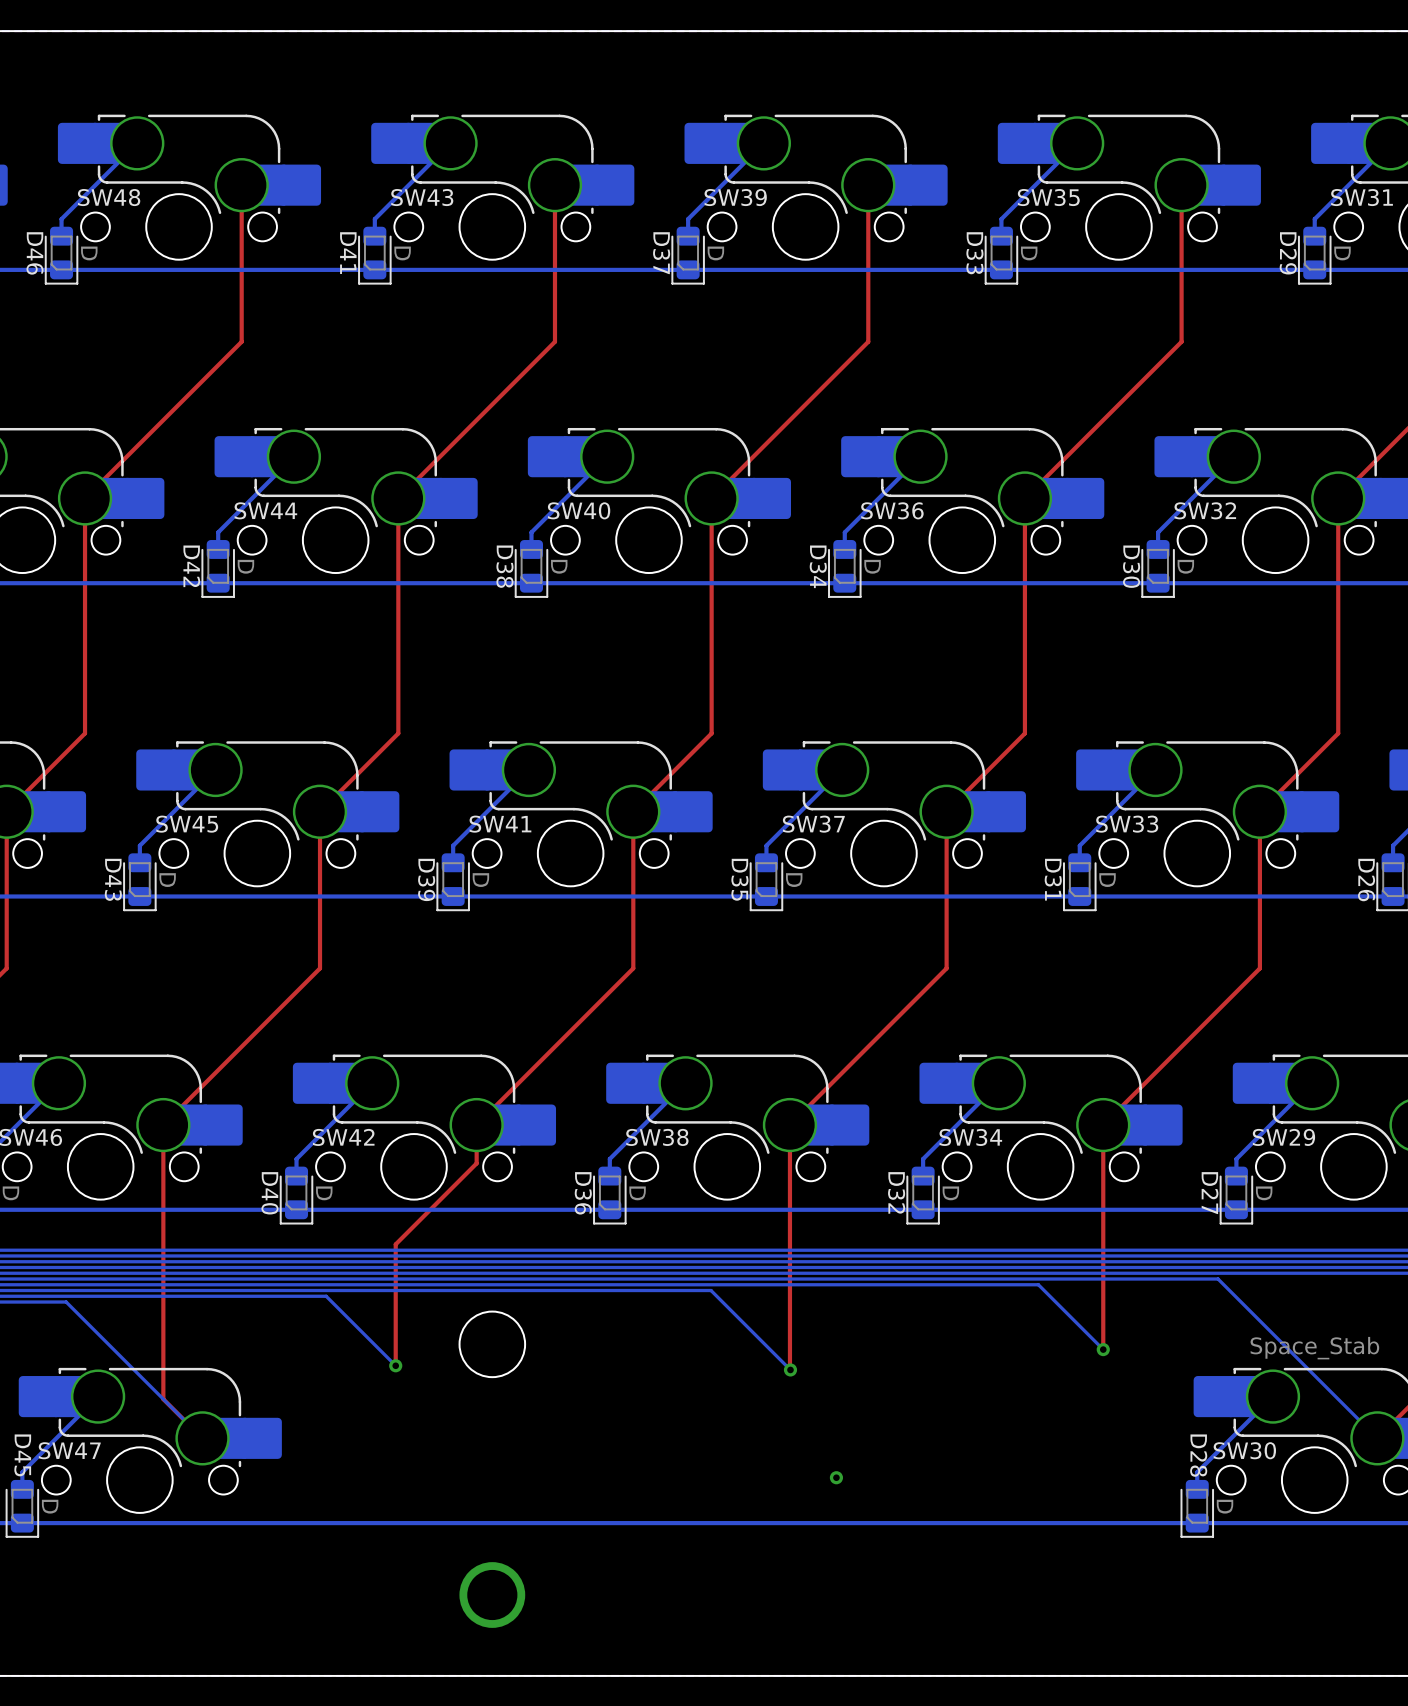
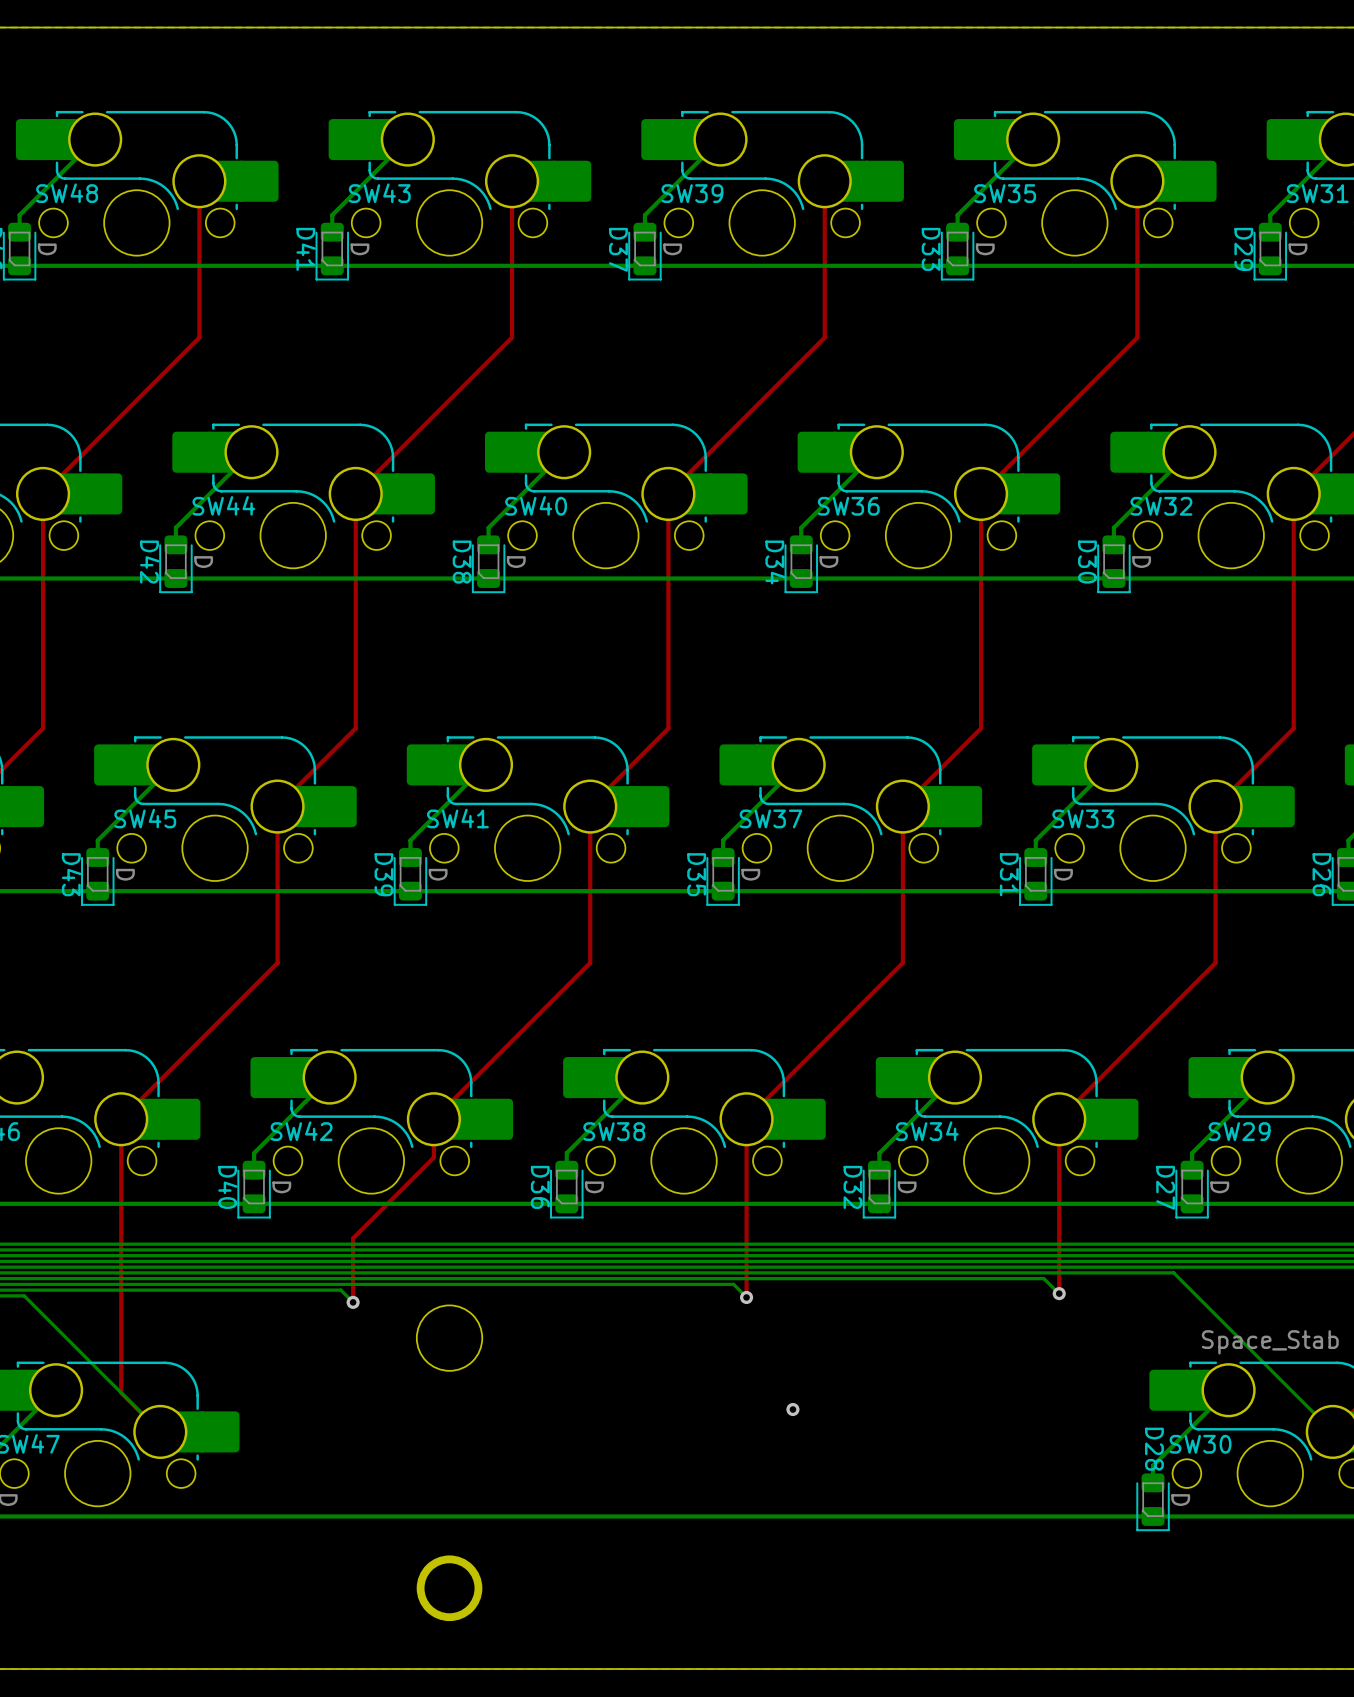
bottom track: (1038, 1284) (1103, 1349) -> (994, 1278) (1043, 1278) (1058, 1293)
bottom track: (711, 1290) (790, 1369) -> (667, 1284) (733, 1284) (746, 1297)
bottom track: (326, 1296) (395, 1365) -> (283, 1290) (340, 1290) (353, 1302)
top track: (1103, 1299) (1103, 1349) -> none
top track: (789, 1303) (790, 1369) -> none
via: none -> (746, 1297)
top track: (395, 1308) (395, 1365) -> none
via position: (1103, 1349) -> (1059, 1293)
via position: (395, 1365) -> (353, 1302)
via: (790, 1369) -> none
via: none -> (792, 1409)
via: (836, 1477) -> none

